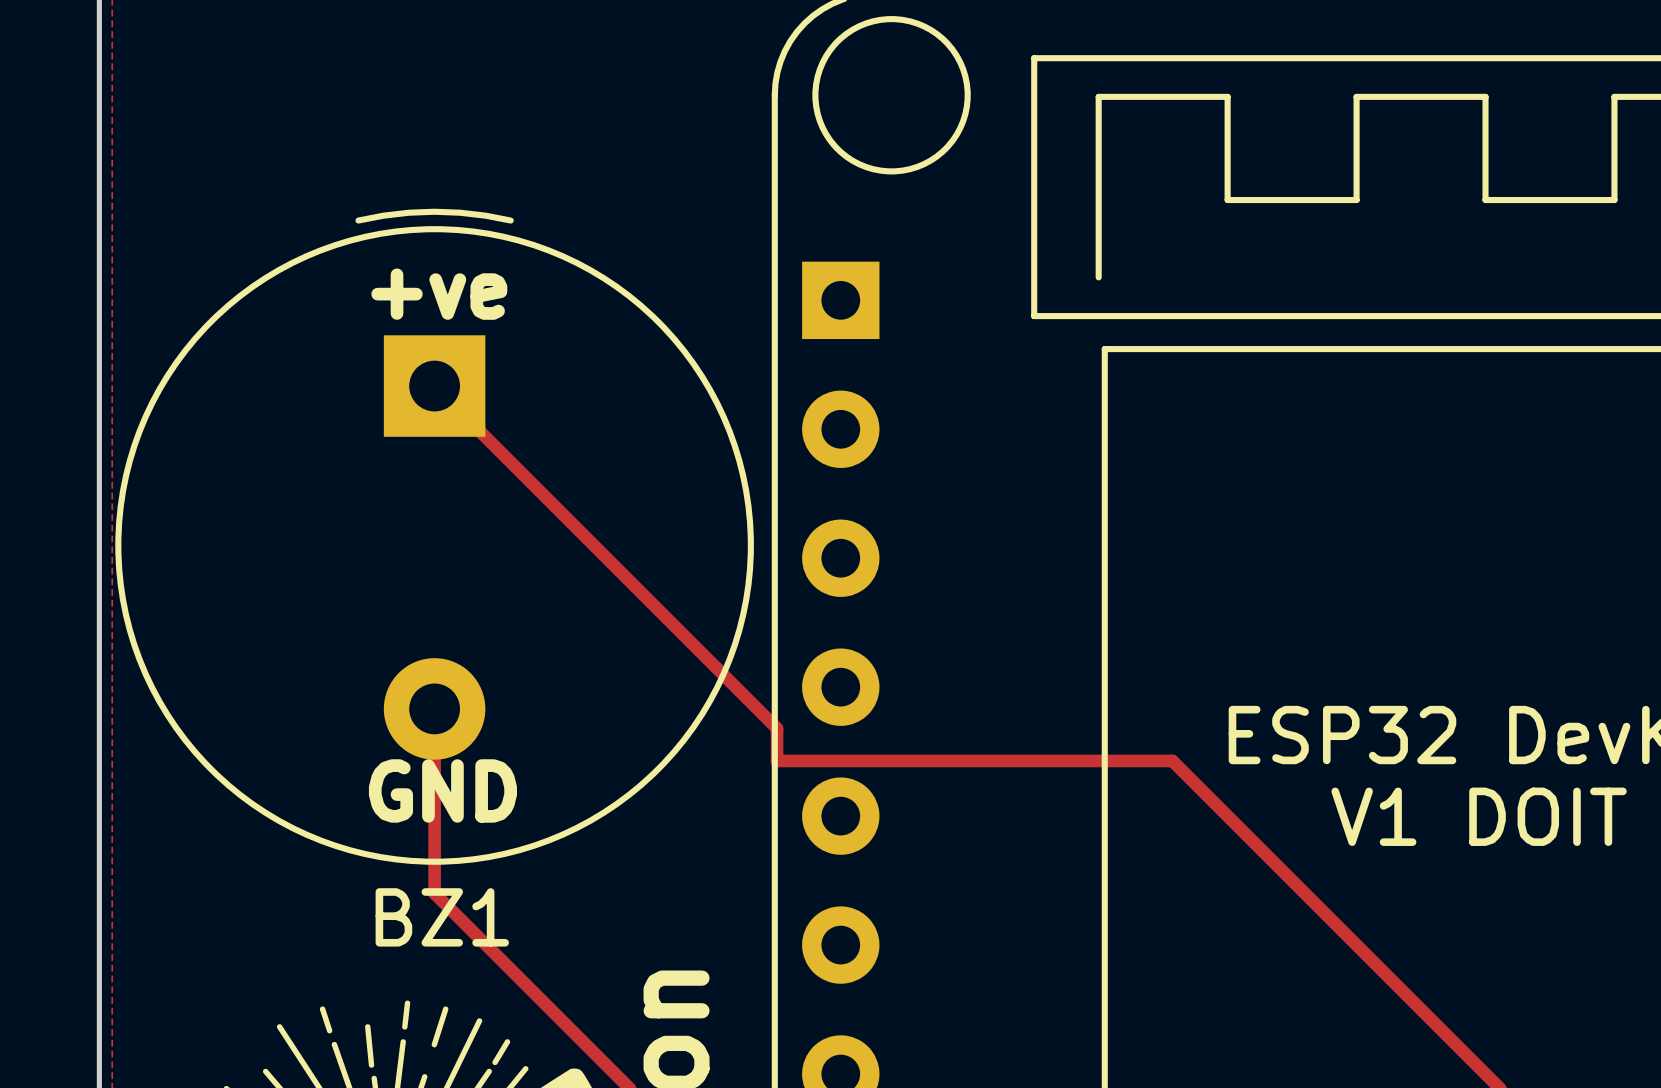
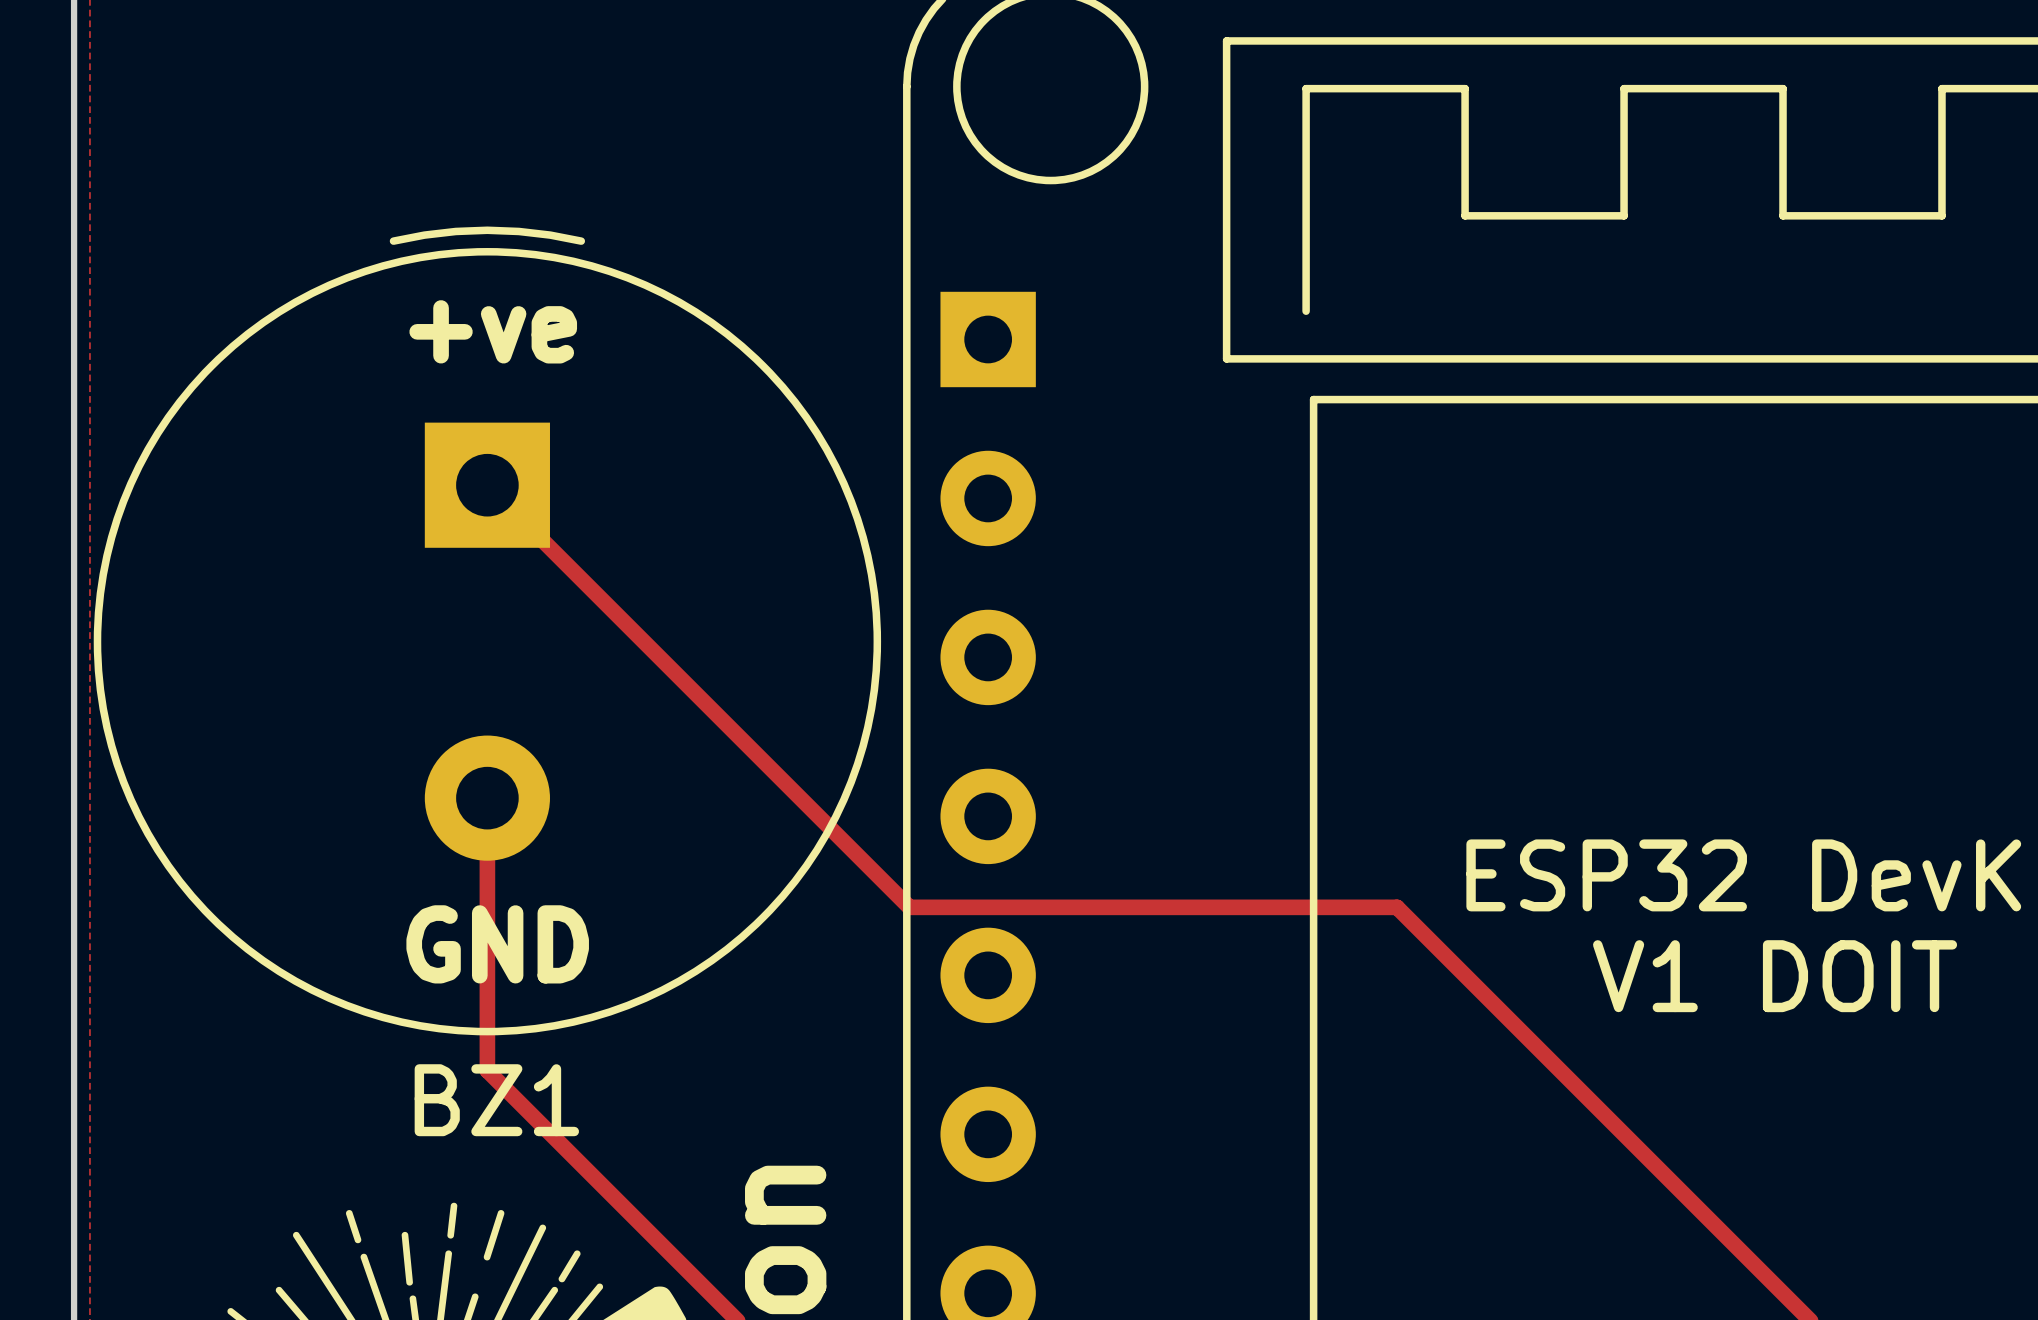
BZ1 footprint: [115, 208, 754, 865] -> [93, 226, 882, 1036]
track: (434, 386) (777, 728) (777, 760) -> (487, 485) (909, 907)

